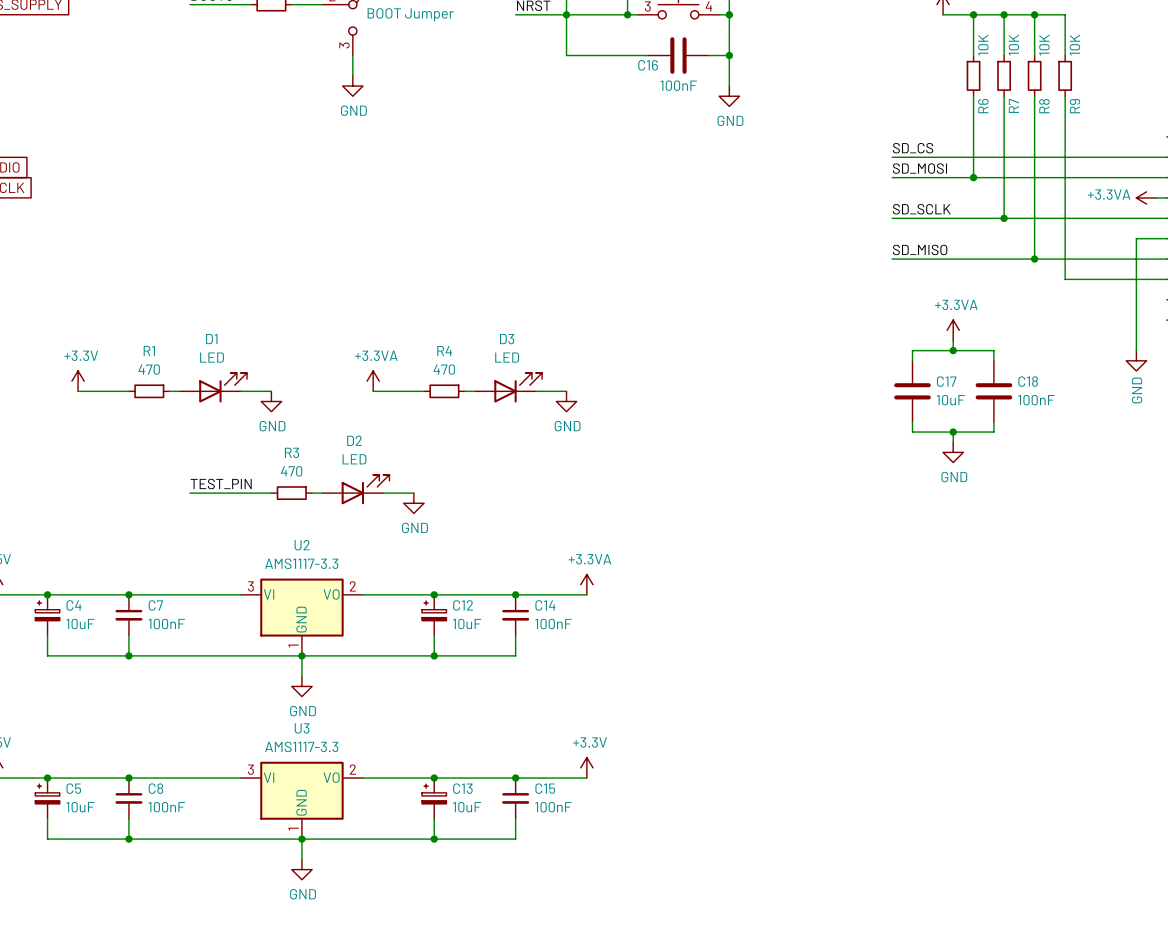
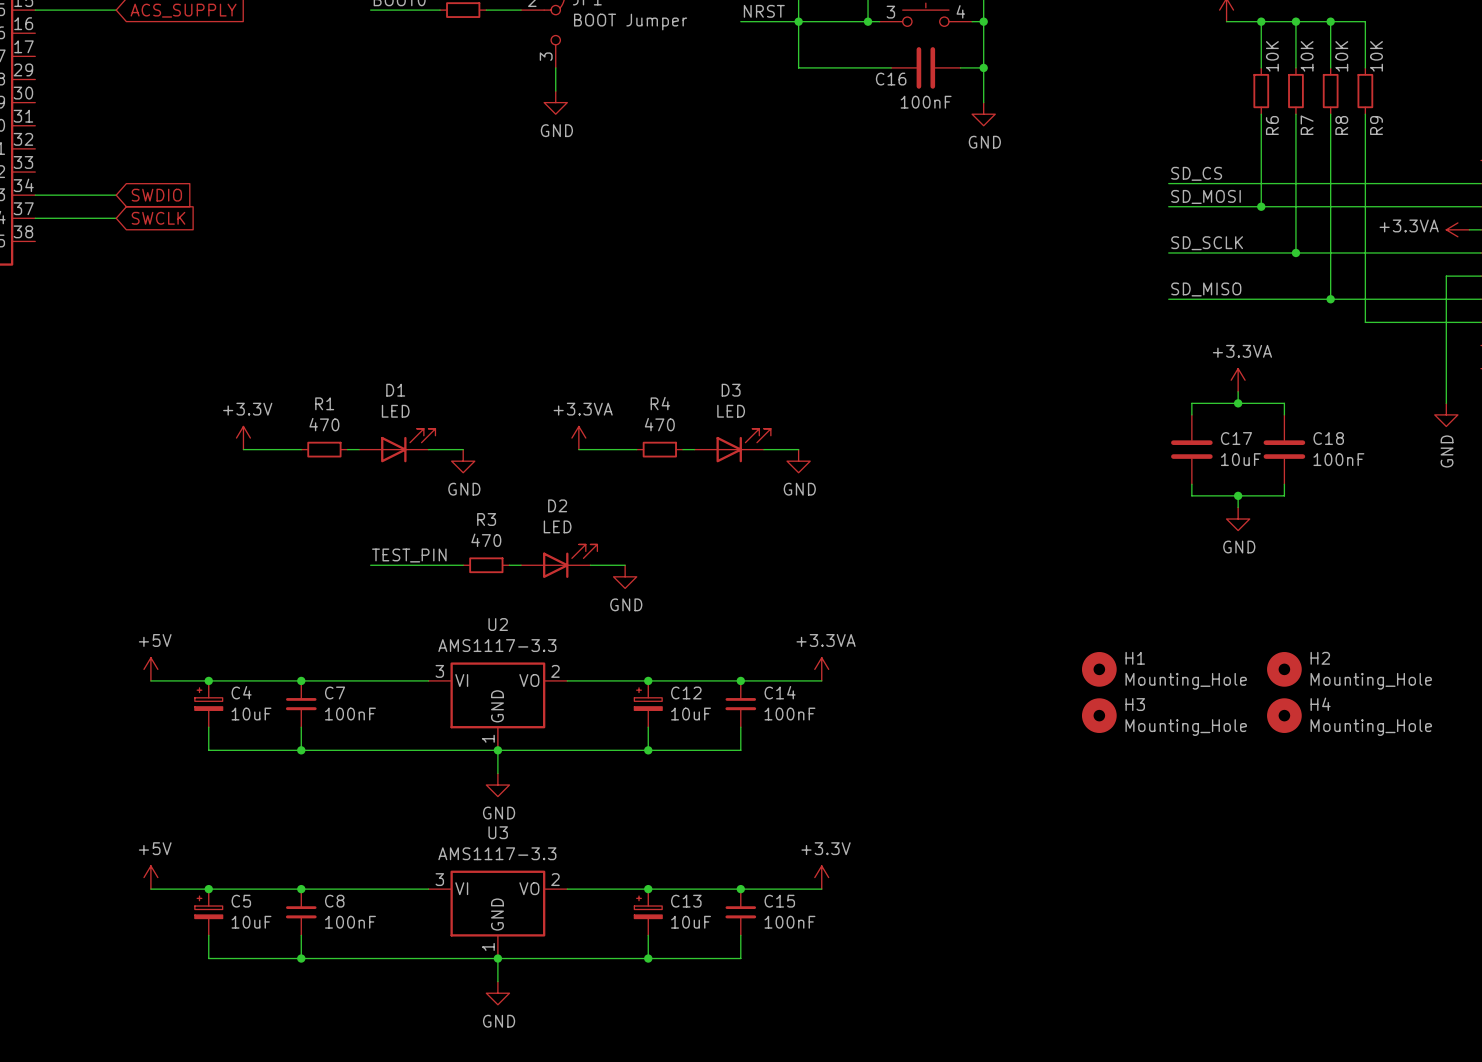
H1: none -> Mounting_Hole (1099, 669)
H2: none -> Mounting_Hole (1284, 669)
H3: none -> Mounting_Hole (1099, 715)
H4: none -> Mounting_Hole (1284, 715)

